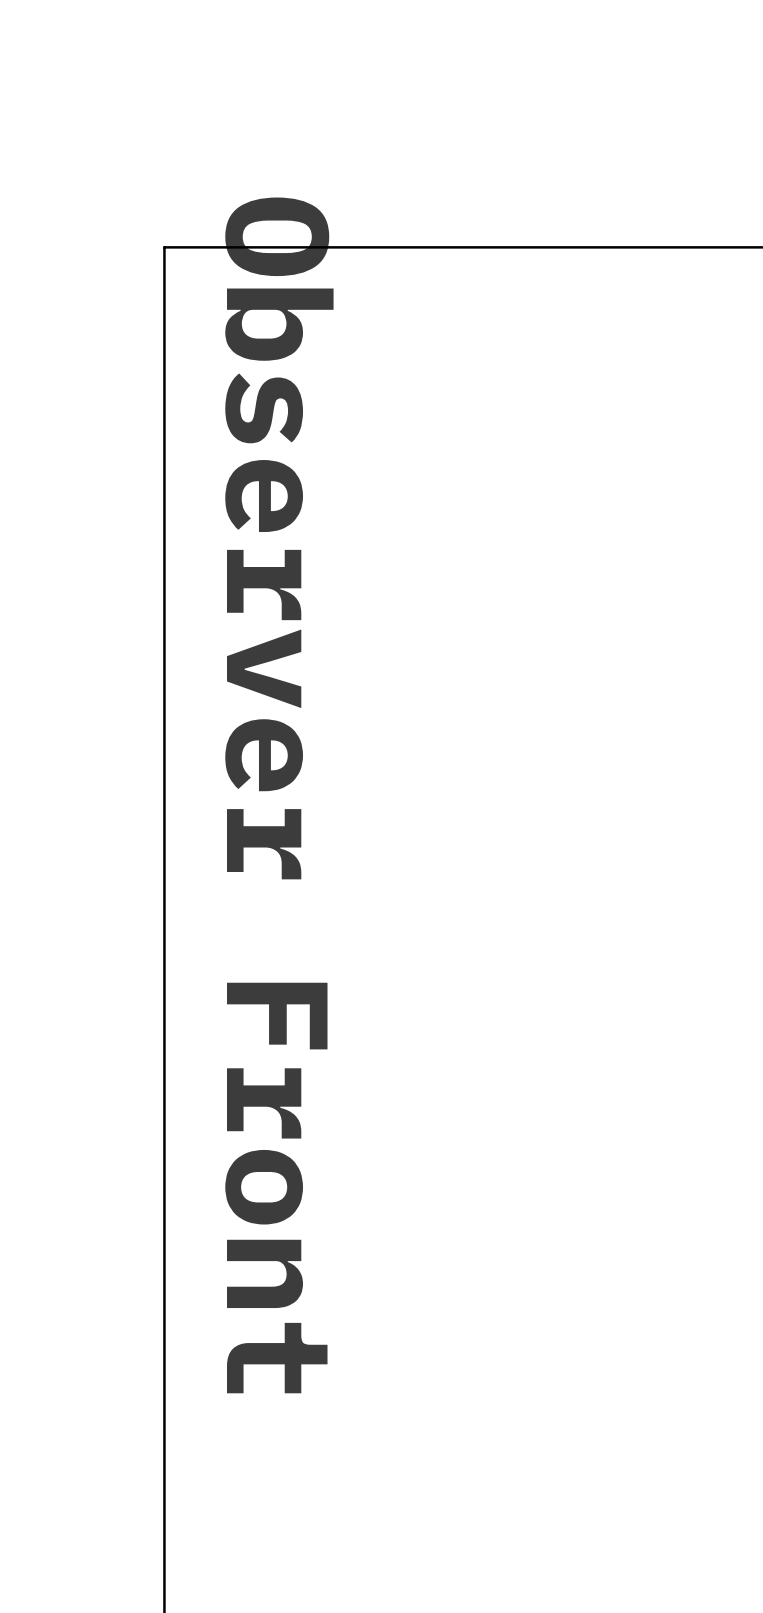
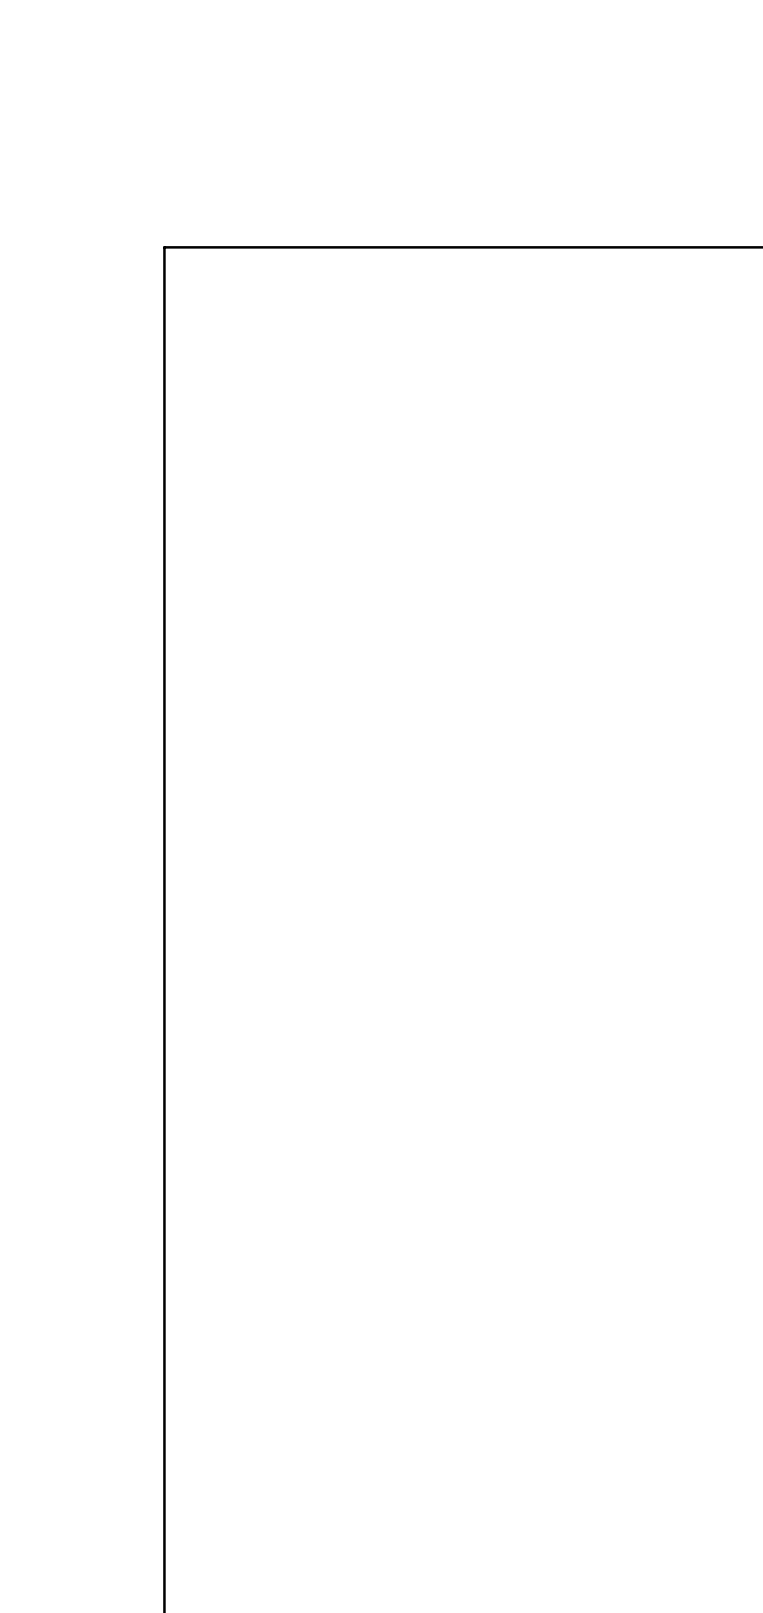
text: Observer Front (279, 795) -> none

